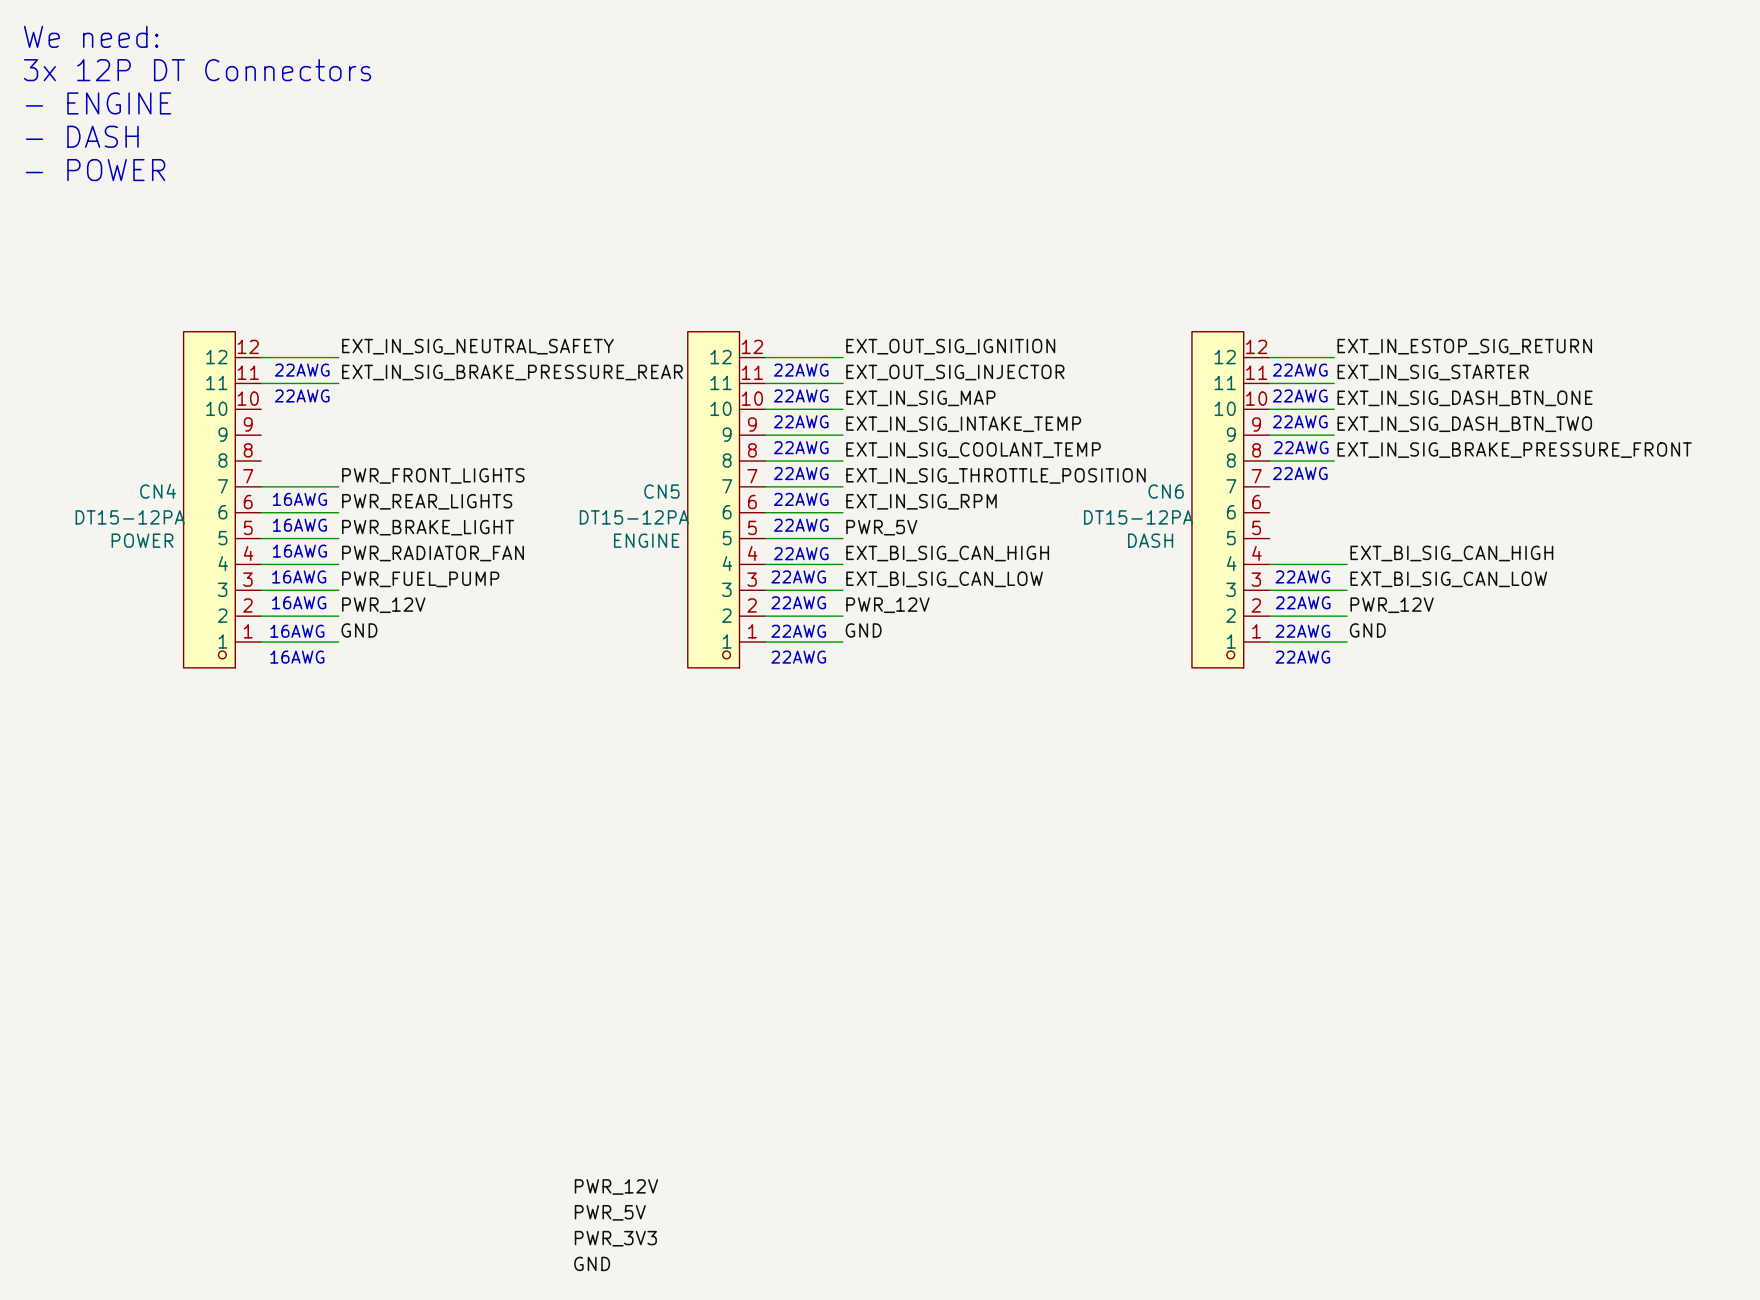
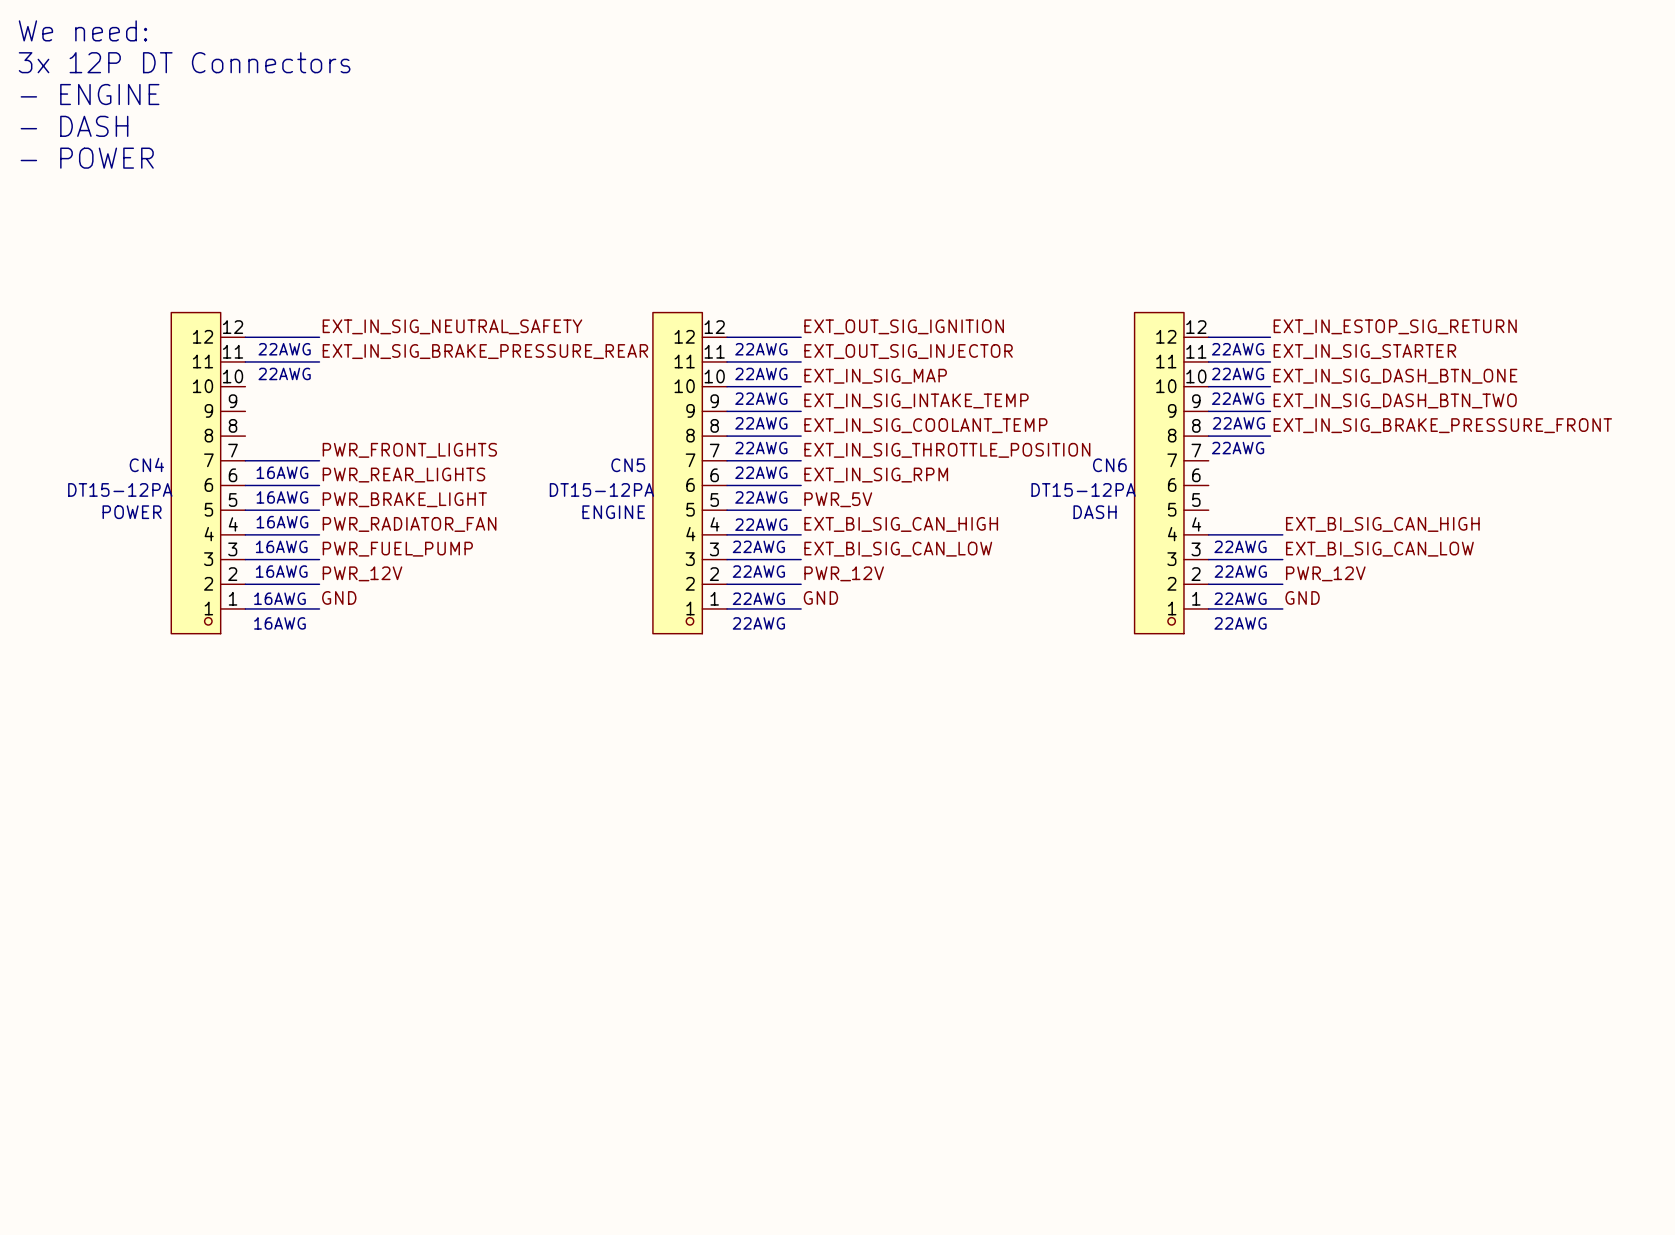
label: PWR_12V (616, 1186) -> none
label: PWR_5V (610, 1212) -> none
label: PWR_3V3 (615, 1238) -> none
label: GND (592, 1263) -> none

